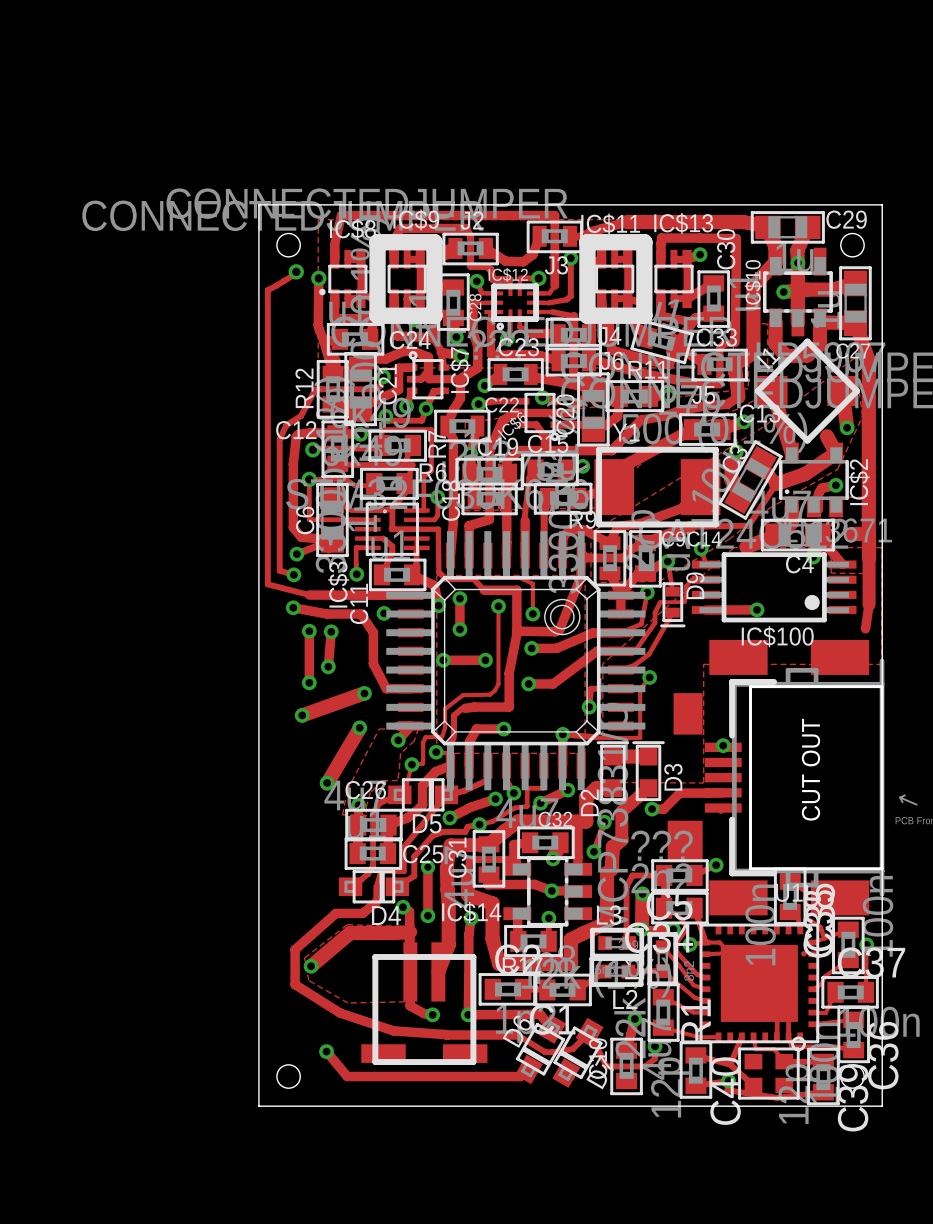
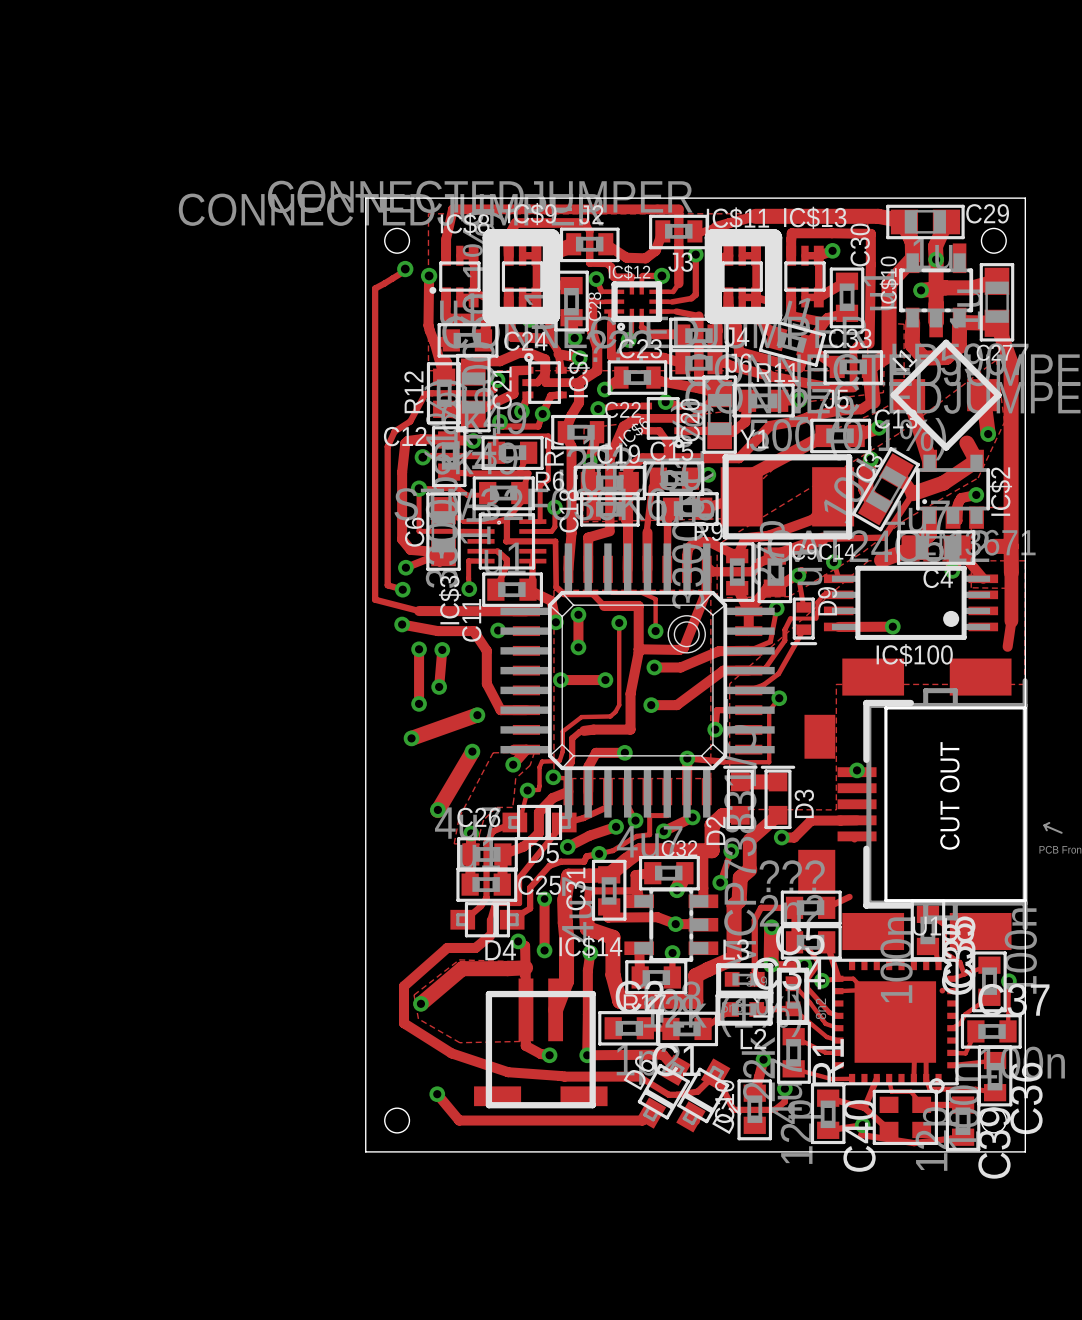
via: (716, 865) -> none

